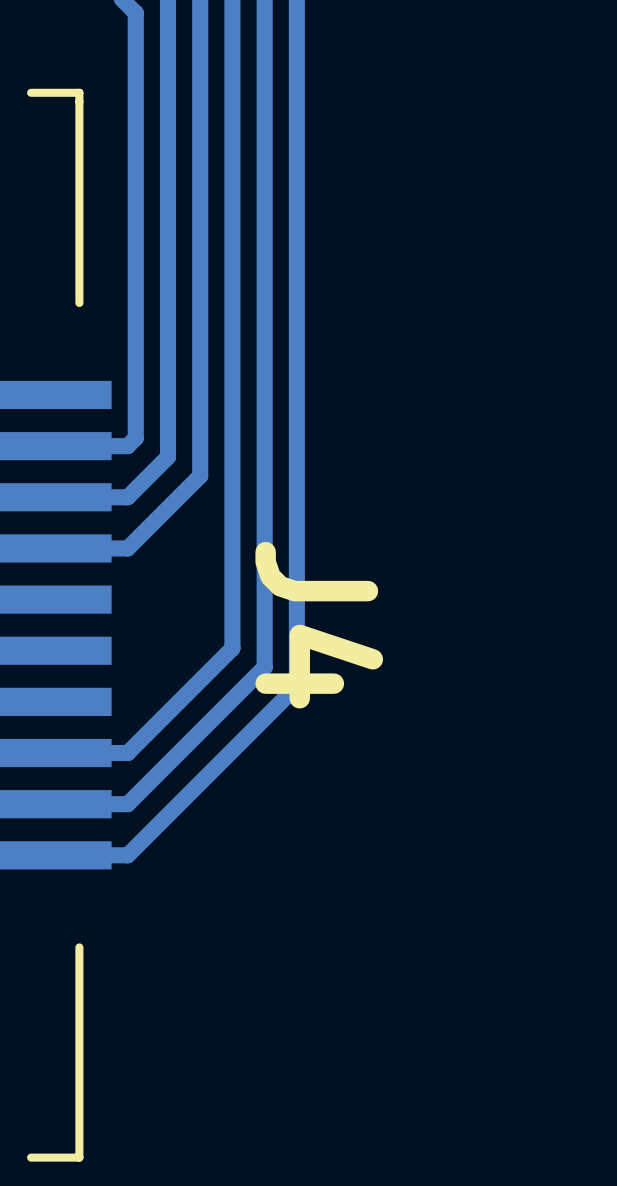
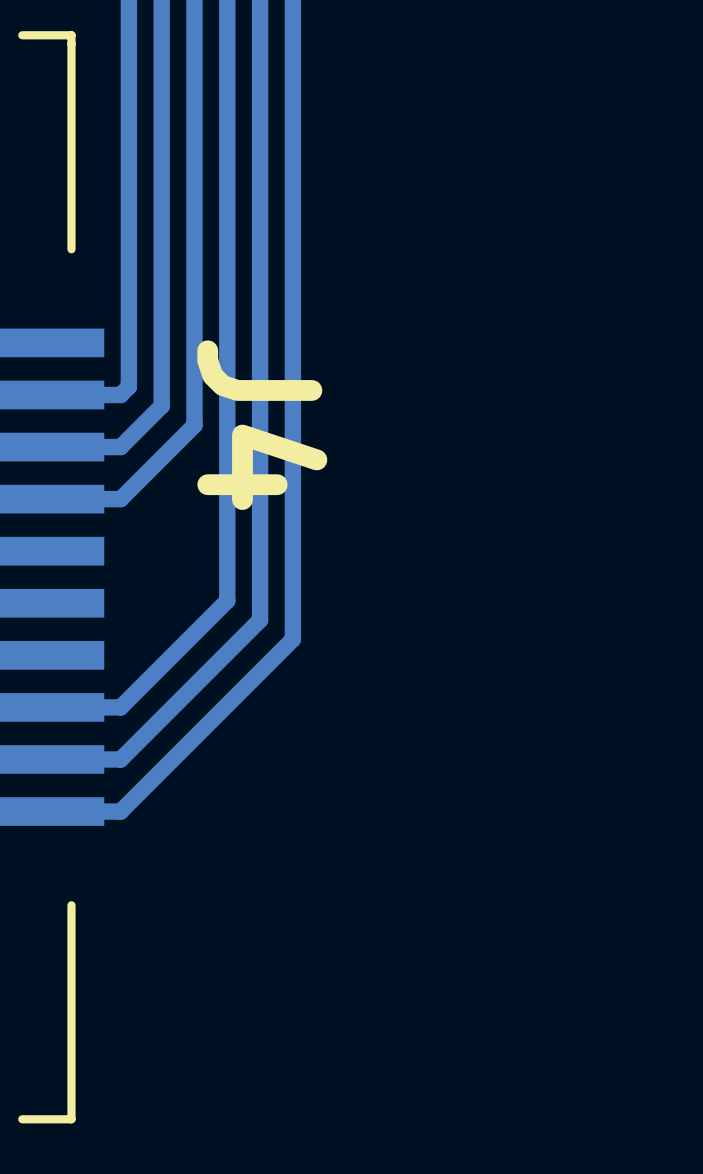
J4 name position: J4 (319, 625) -> J4 (262, 425)

